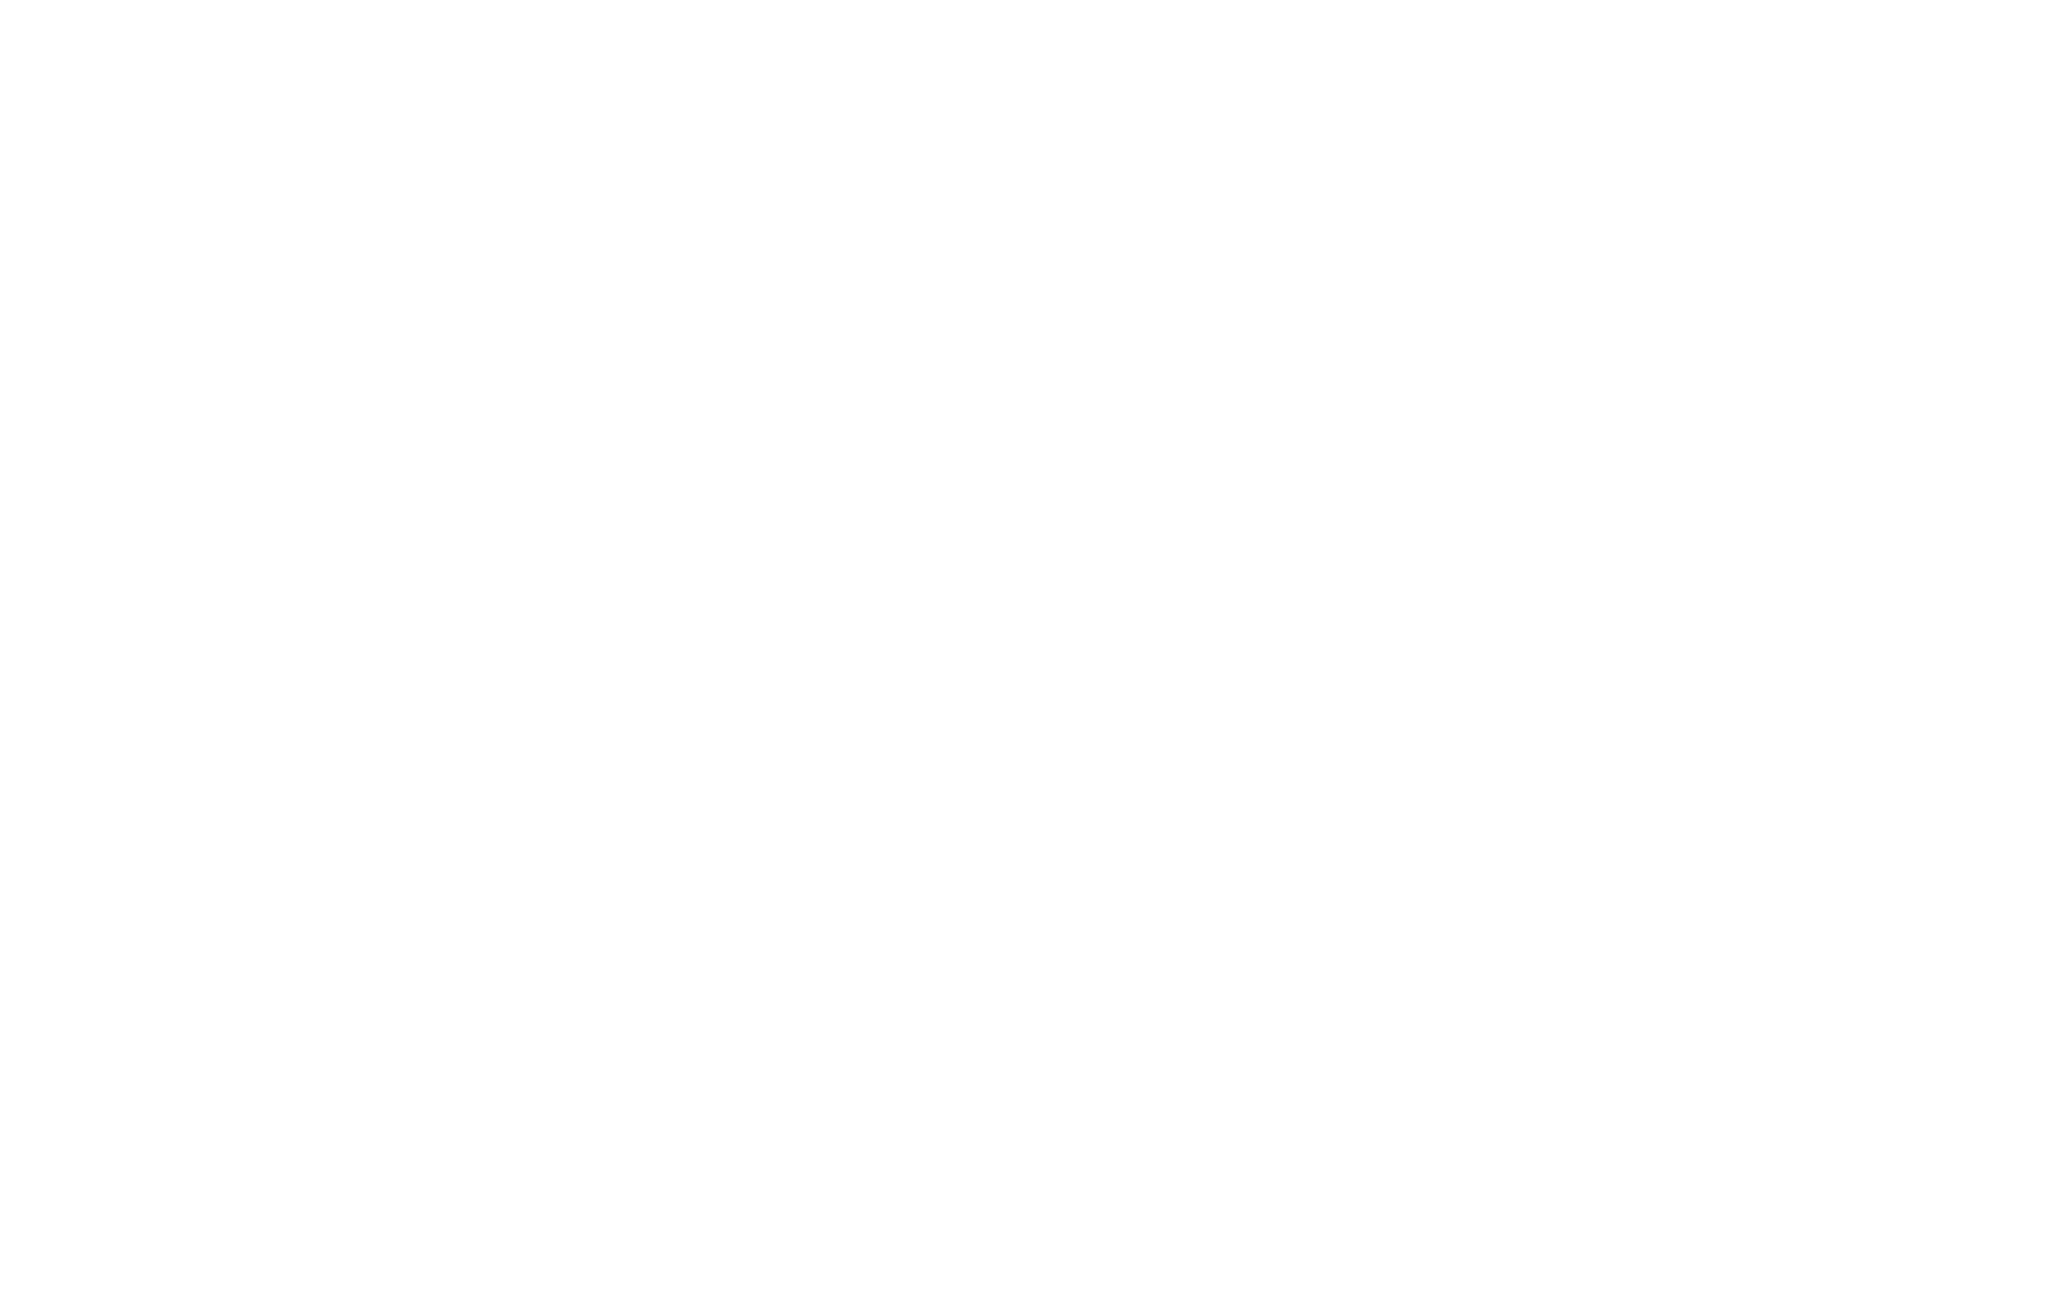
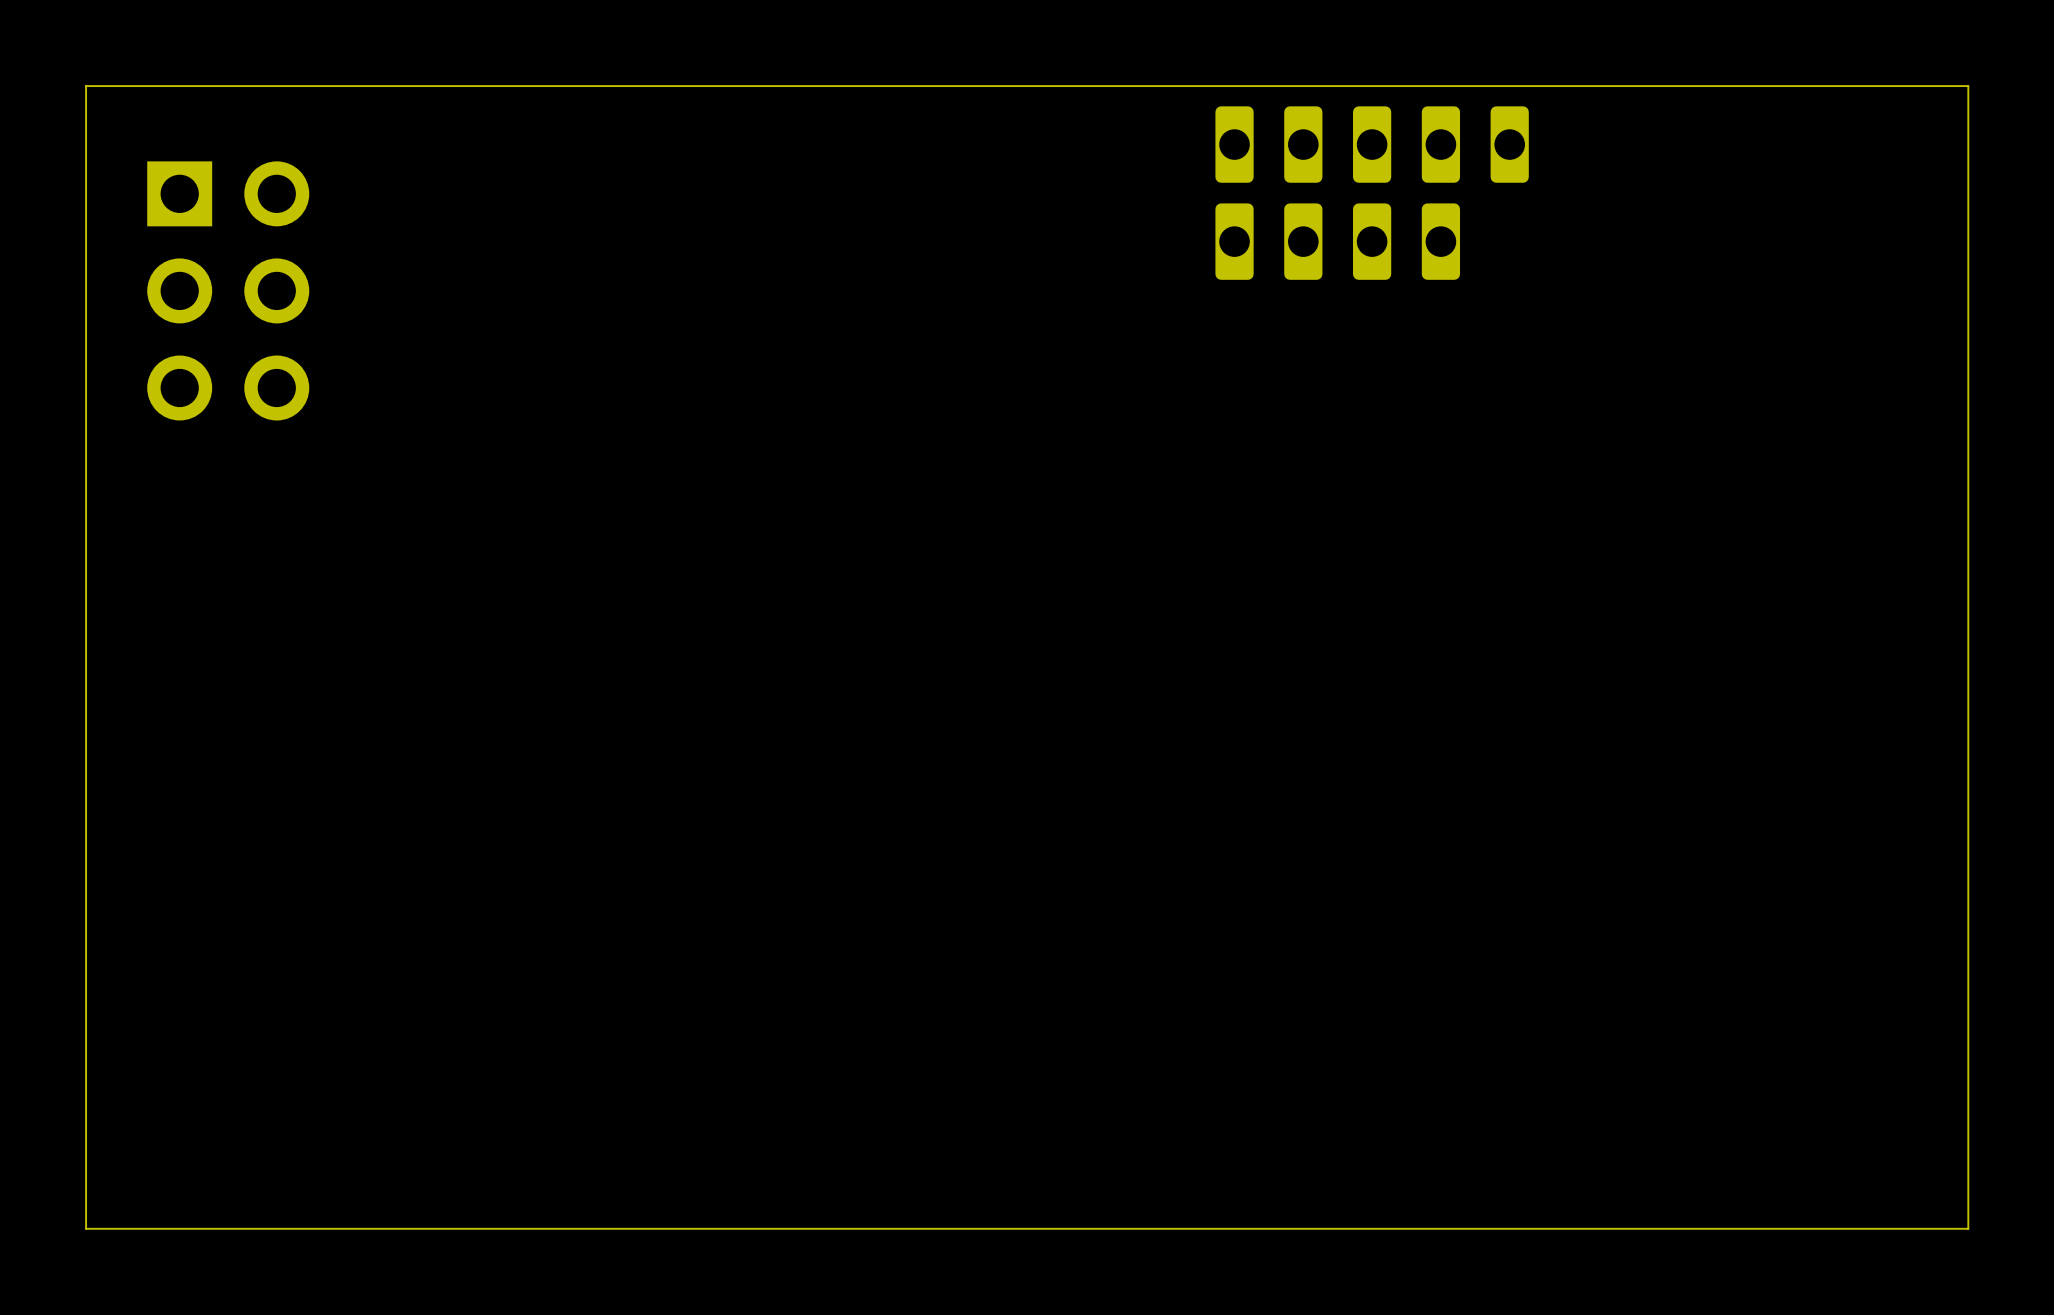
board edge: none -> (1968, 86) (86, 86) (86, 1228) (1968, 1228) (1968, 86)
part: none -> (1372, 193)
part: none -> (228, 290)

